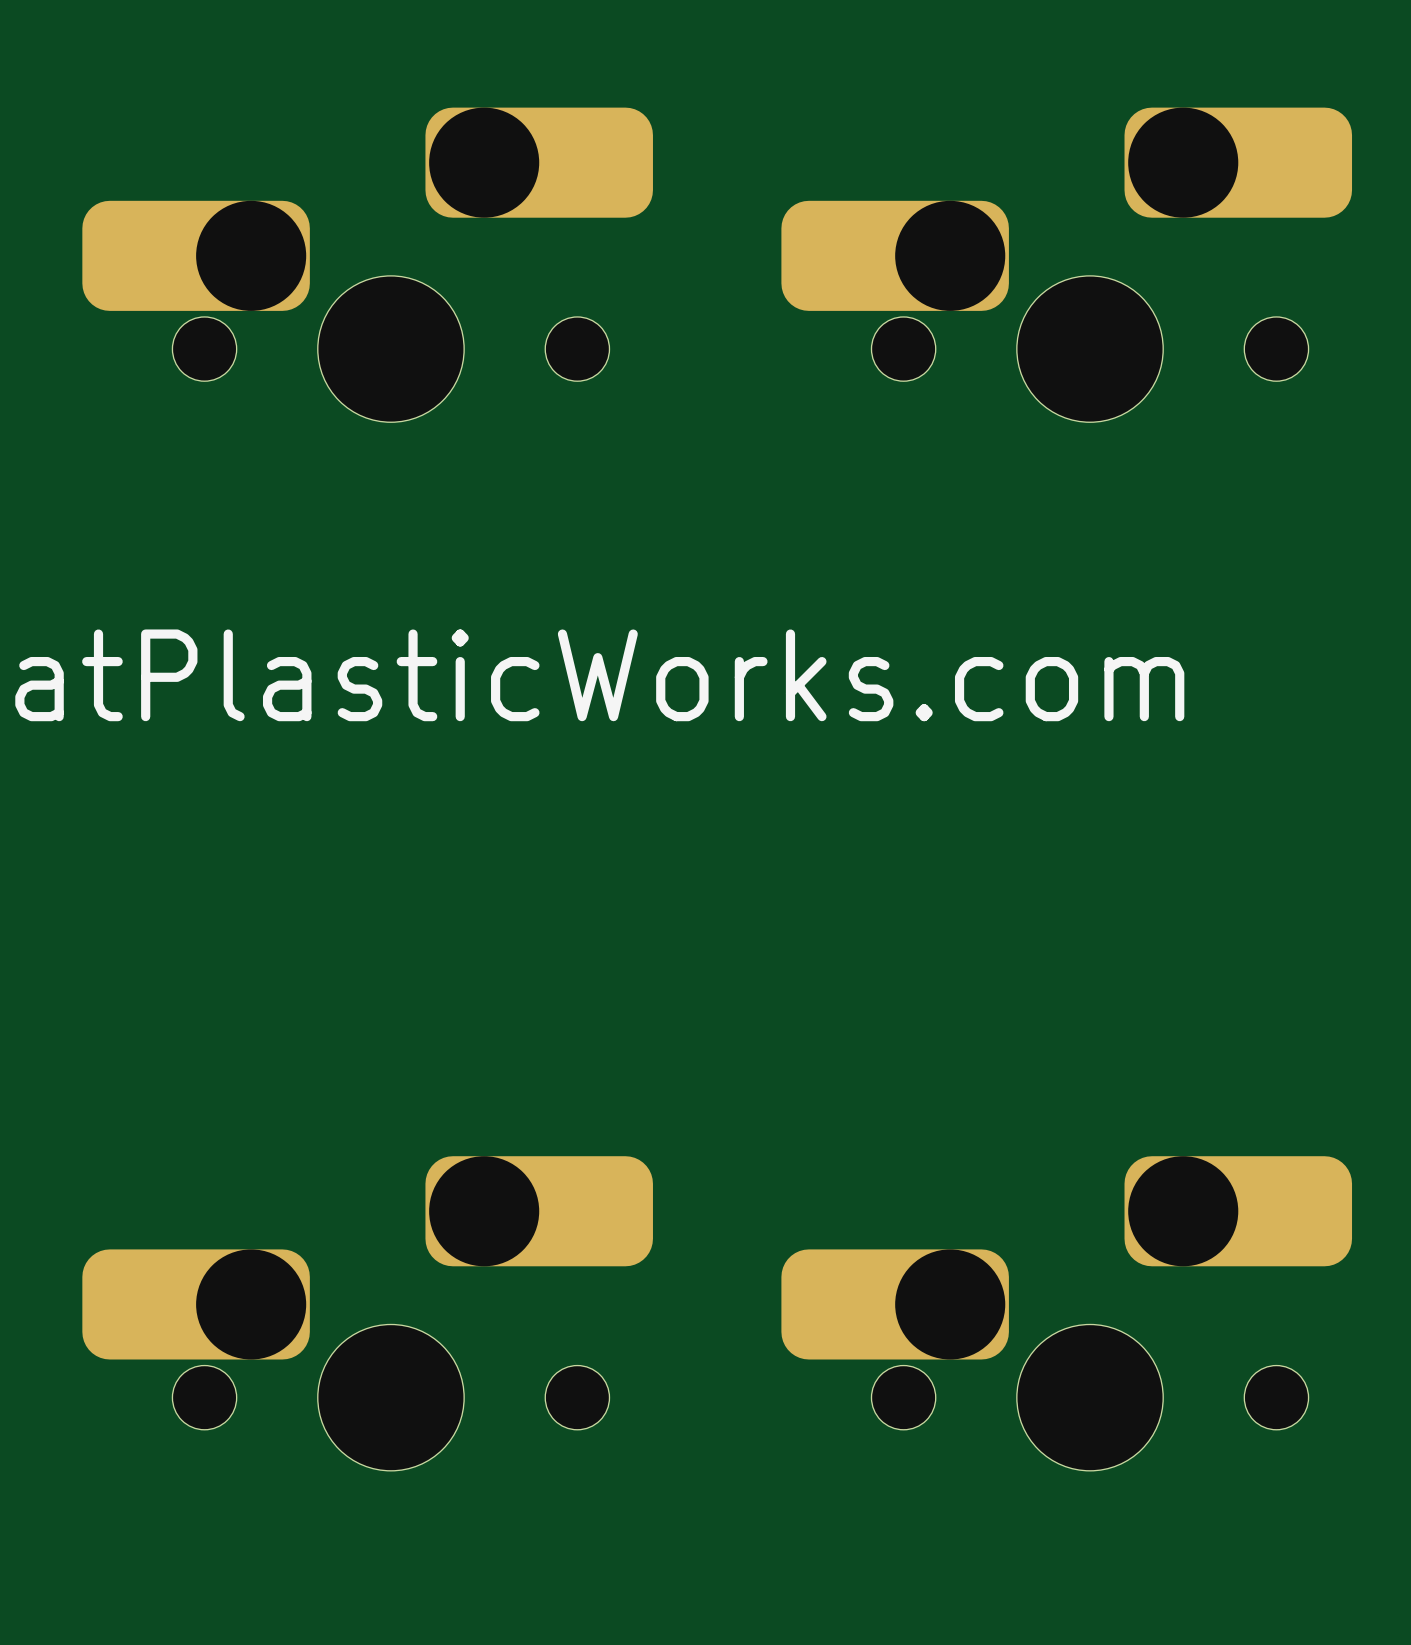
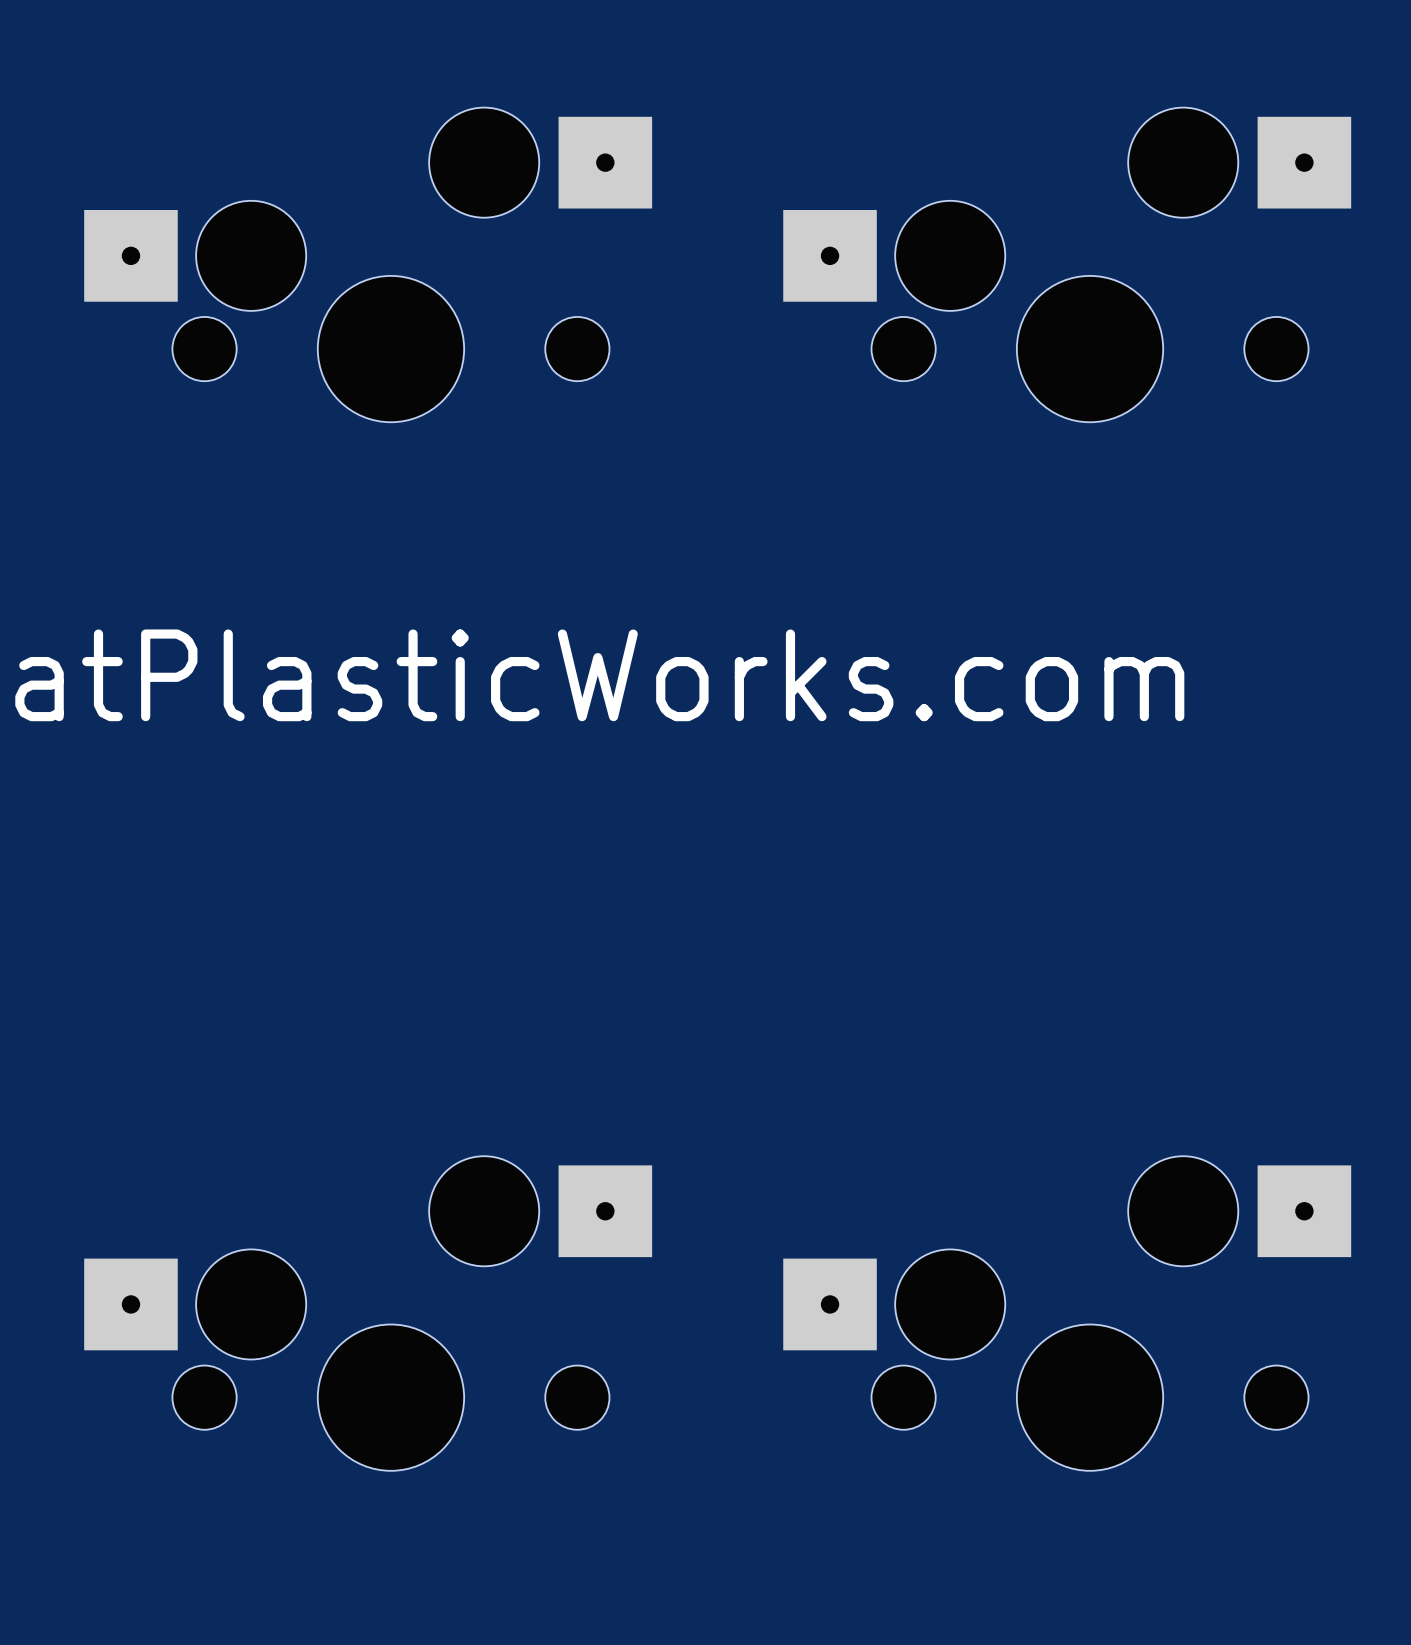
part footprint: [82, 107, 653, 423] -> [84, 107, 653, 423]
part footprint: [781, 107, 1353, 423] -> [783, 107, 1352, 423]
part footprint: [82, 1156, 653, 1471] -> [84, 1156, 653, 1471]
part footprint: [781, 1156, 1353, 1471] -> [783, 1156, 1352, 1471]

